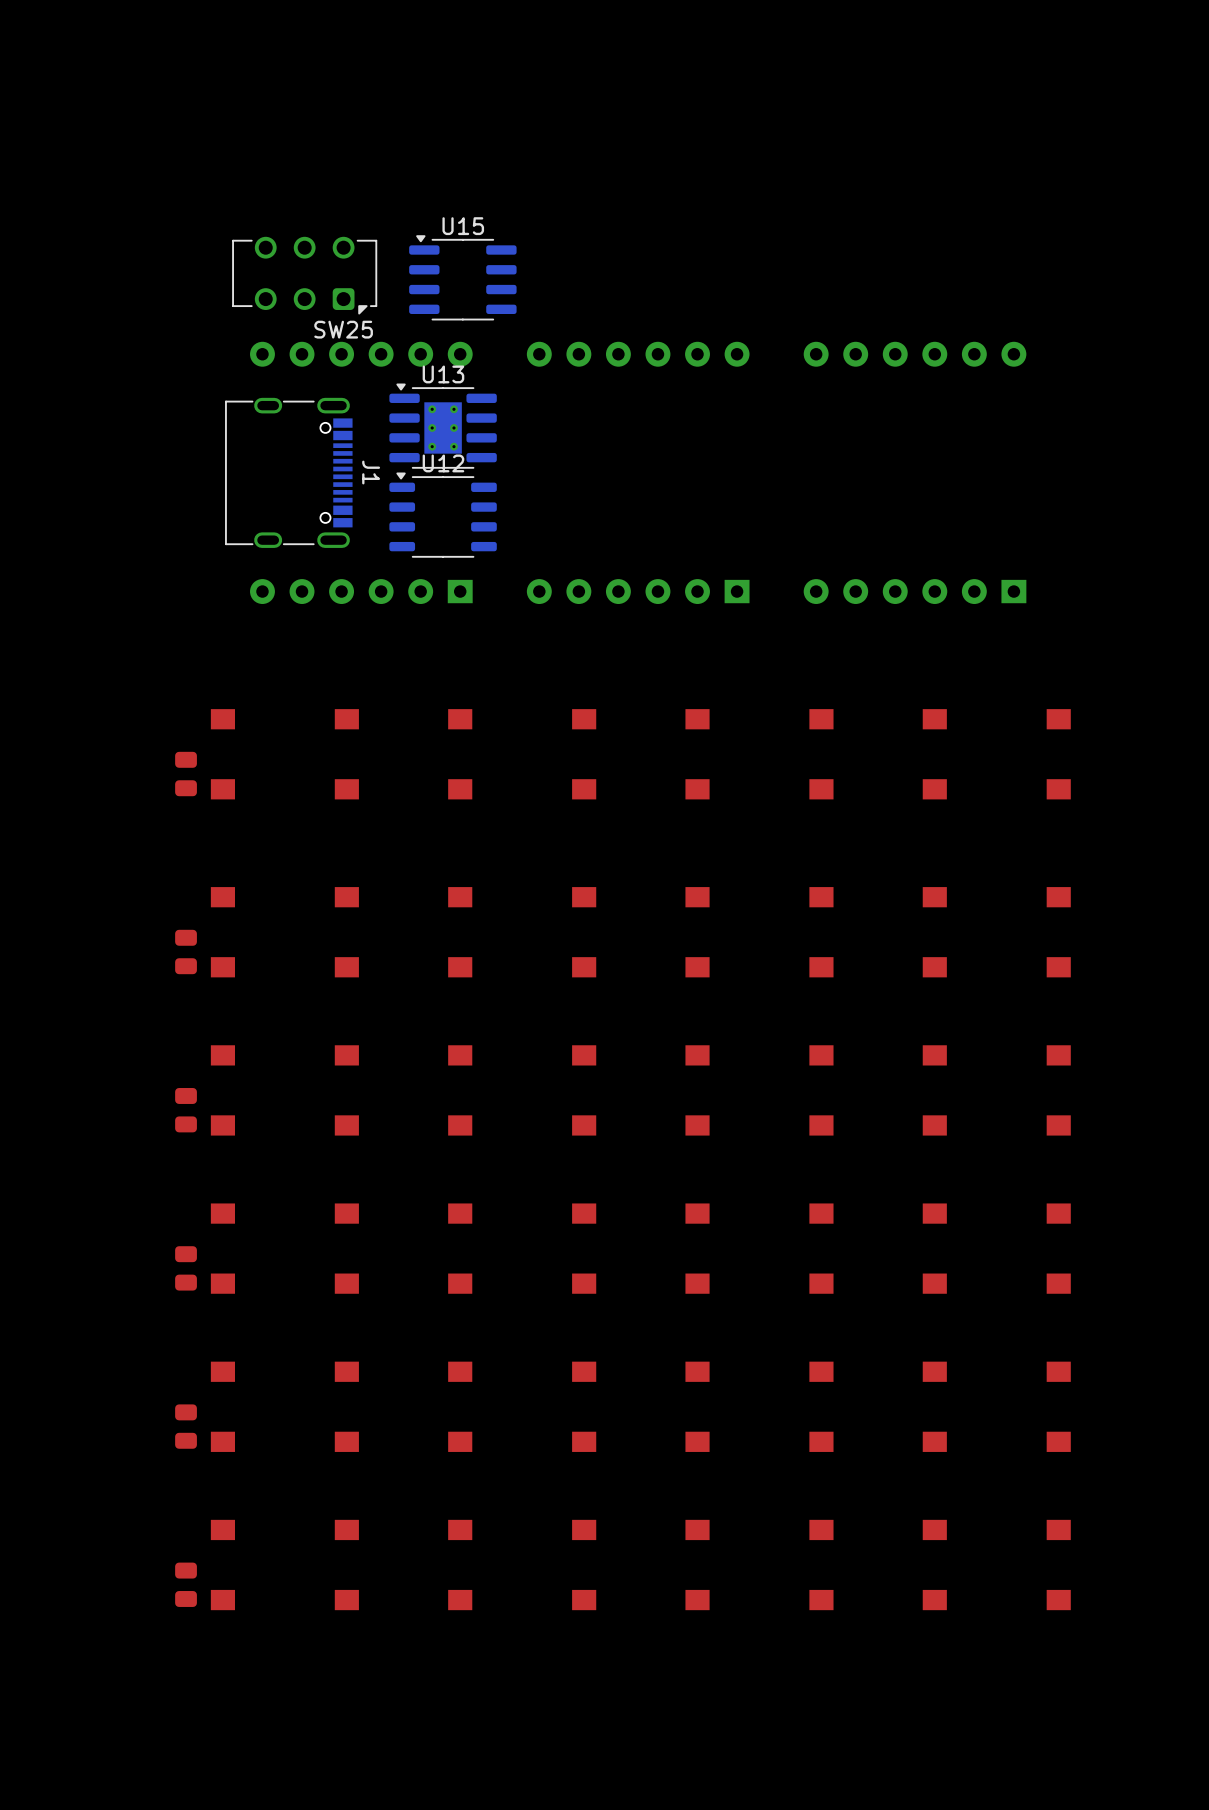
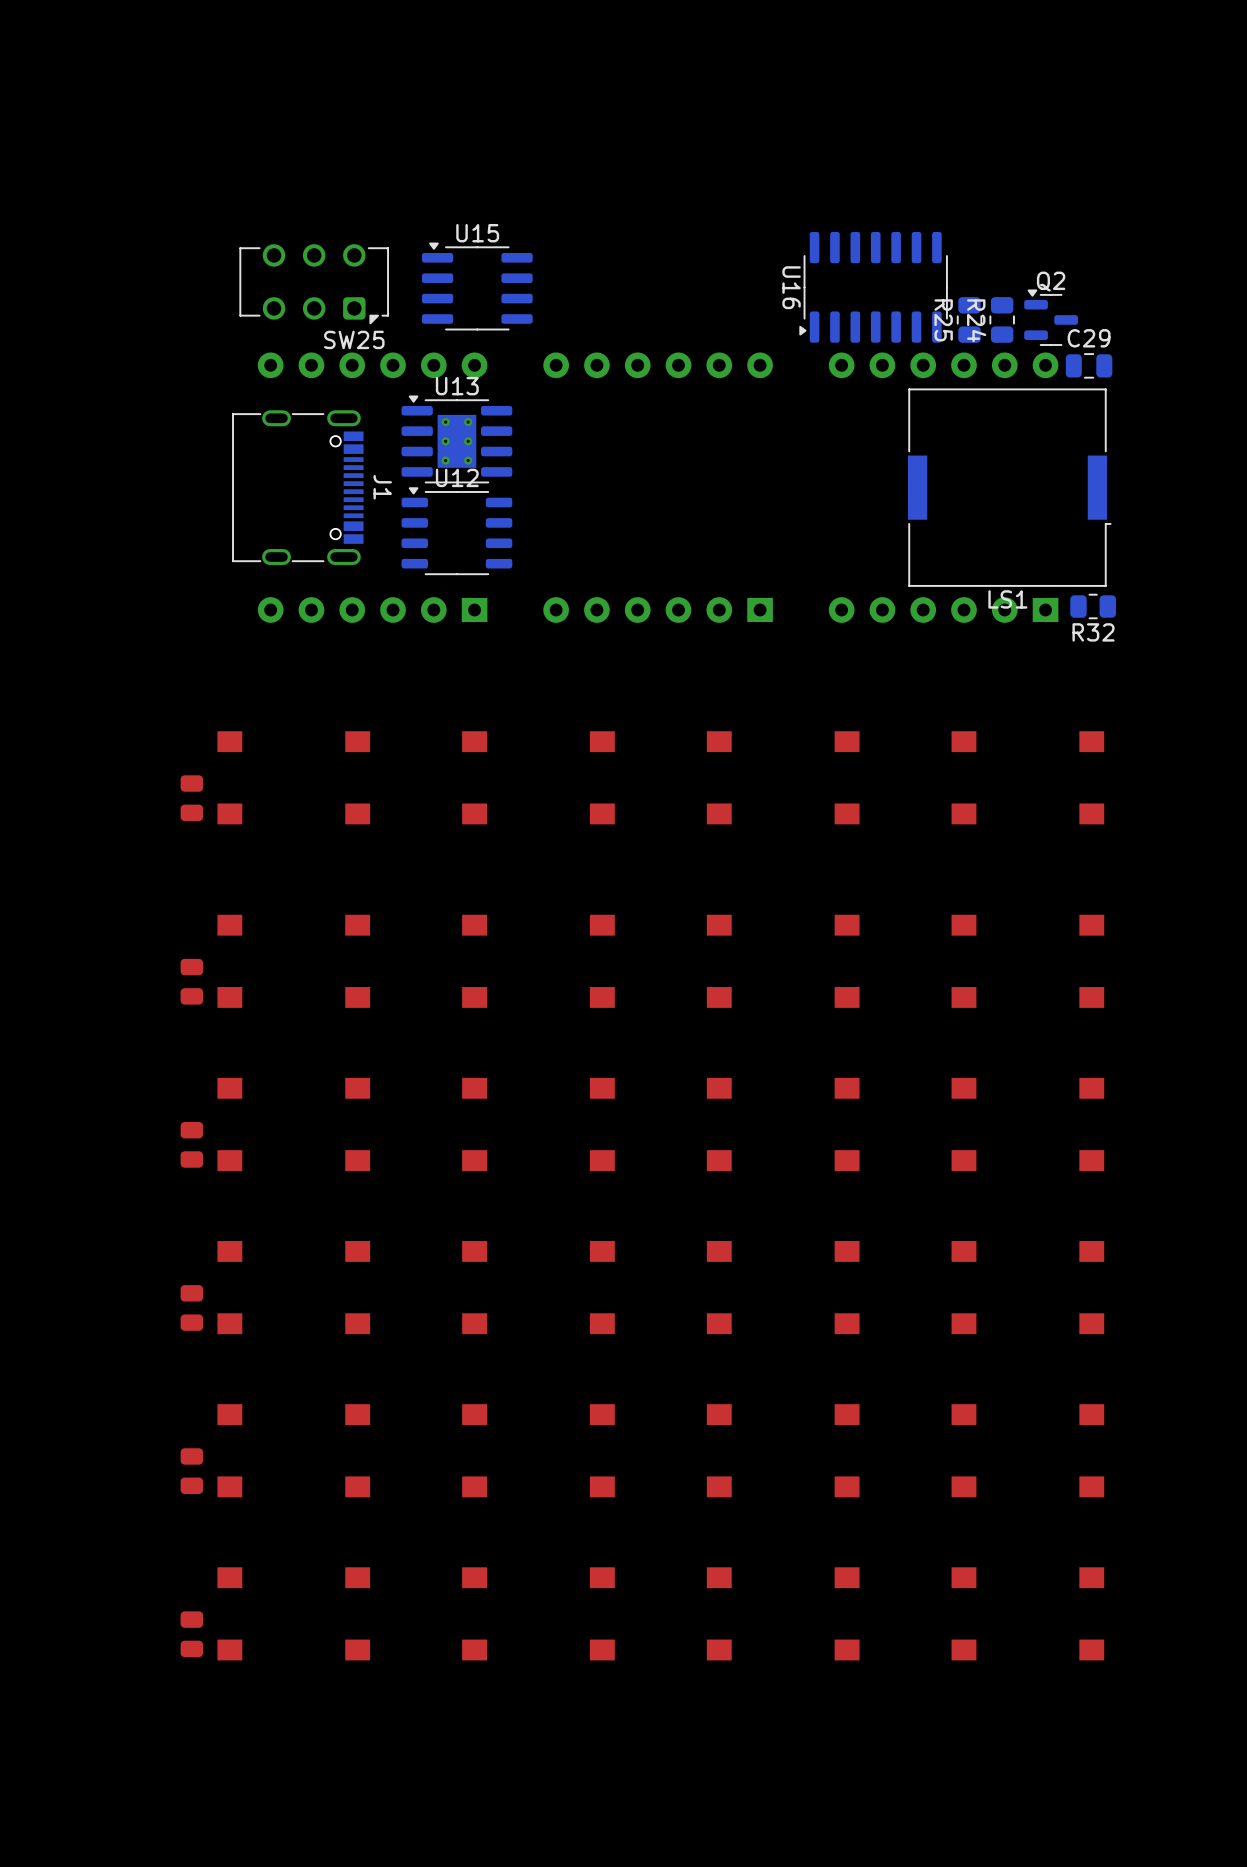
U16: none -> (873, 287)
Q2: none -> (1051, 317)
R25: none -> (969, 319)
R24: none -> (1002, 319)
C29: none -> (1089, 365)
LS1: none -> (1009, 487)
R32: none -> (1093, 606)

